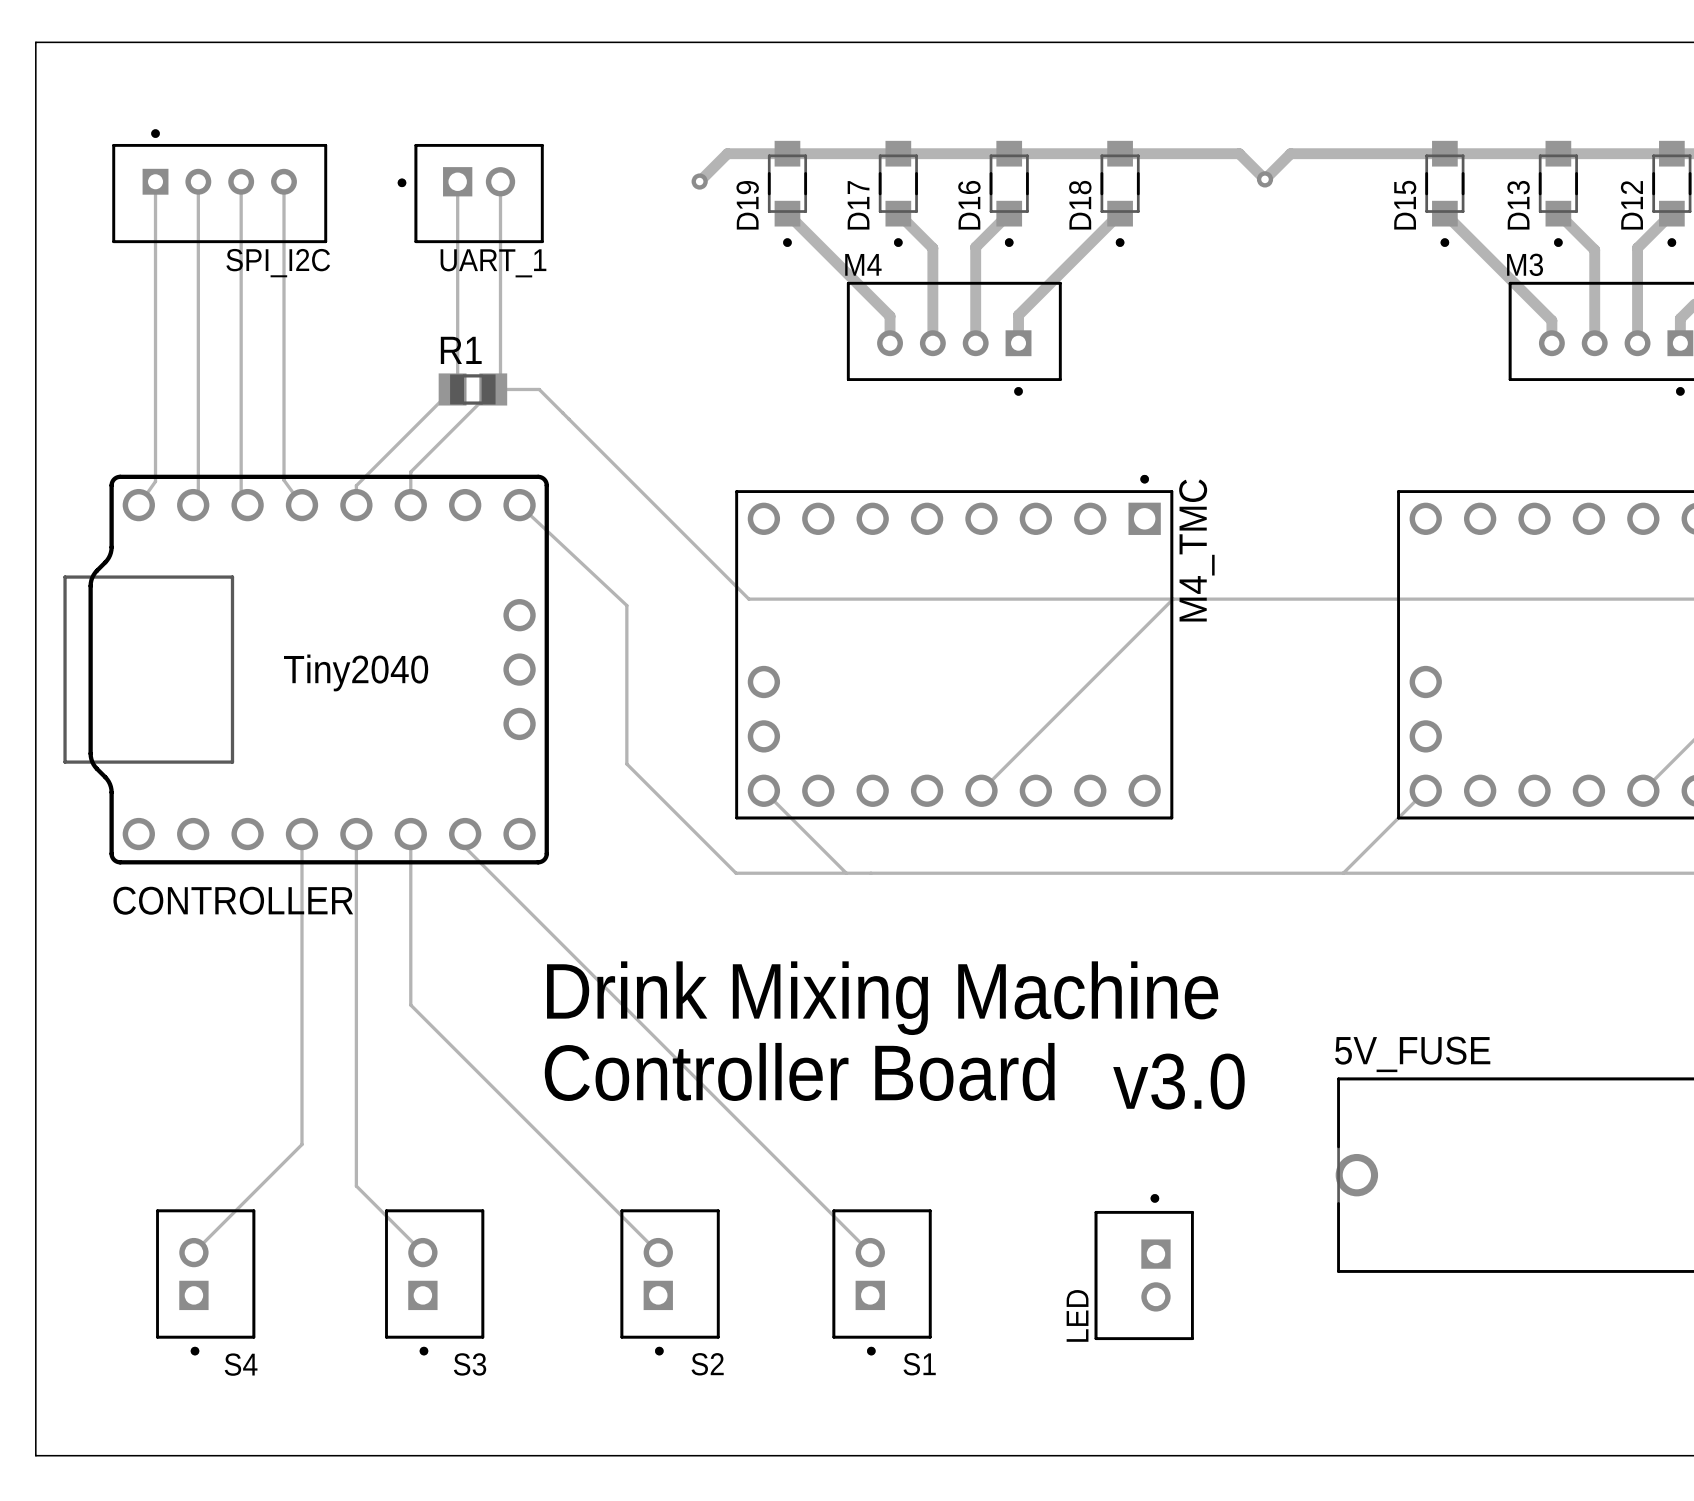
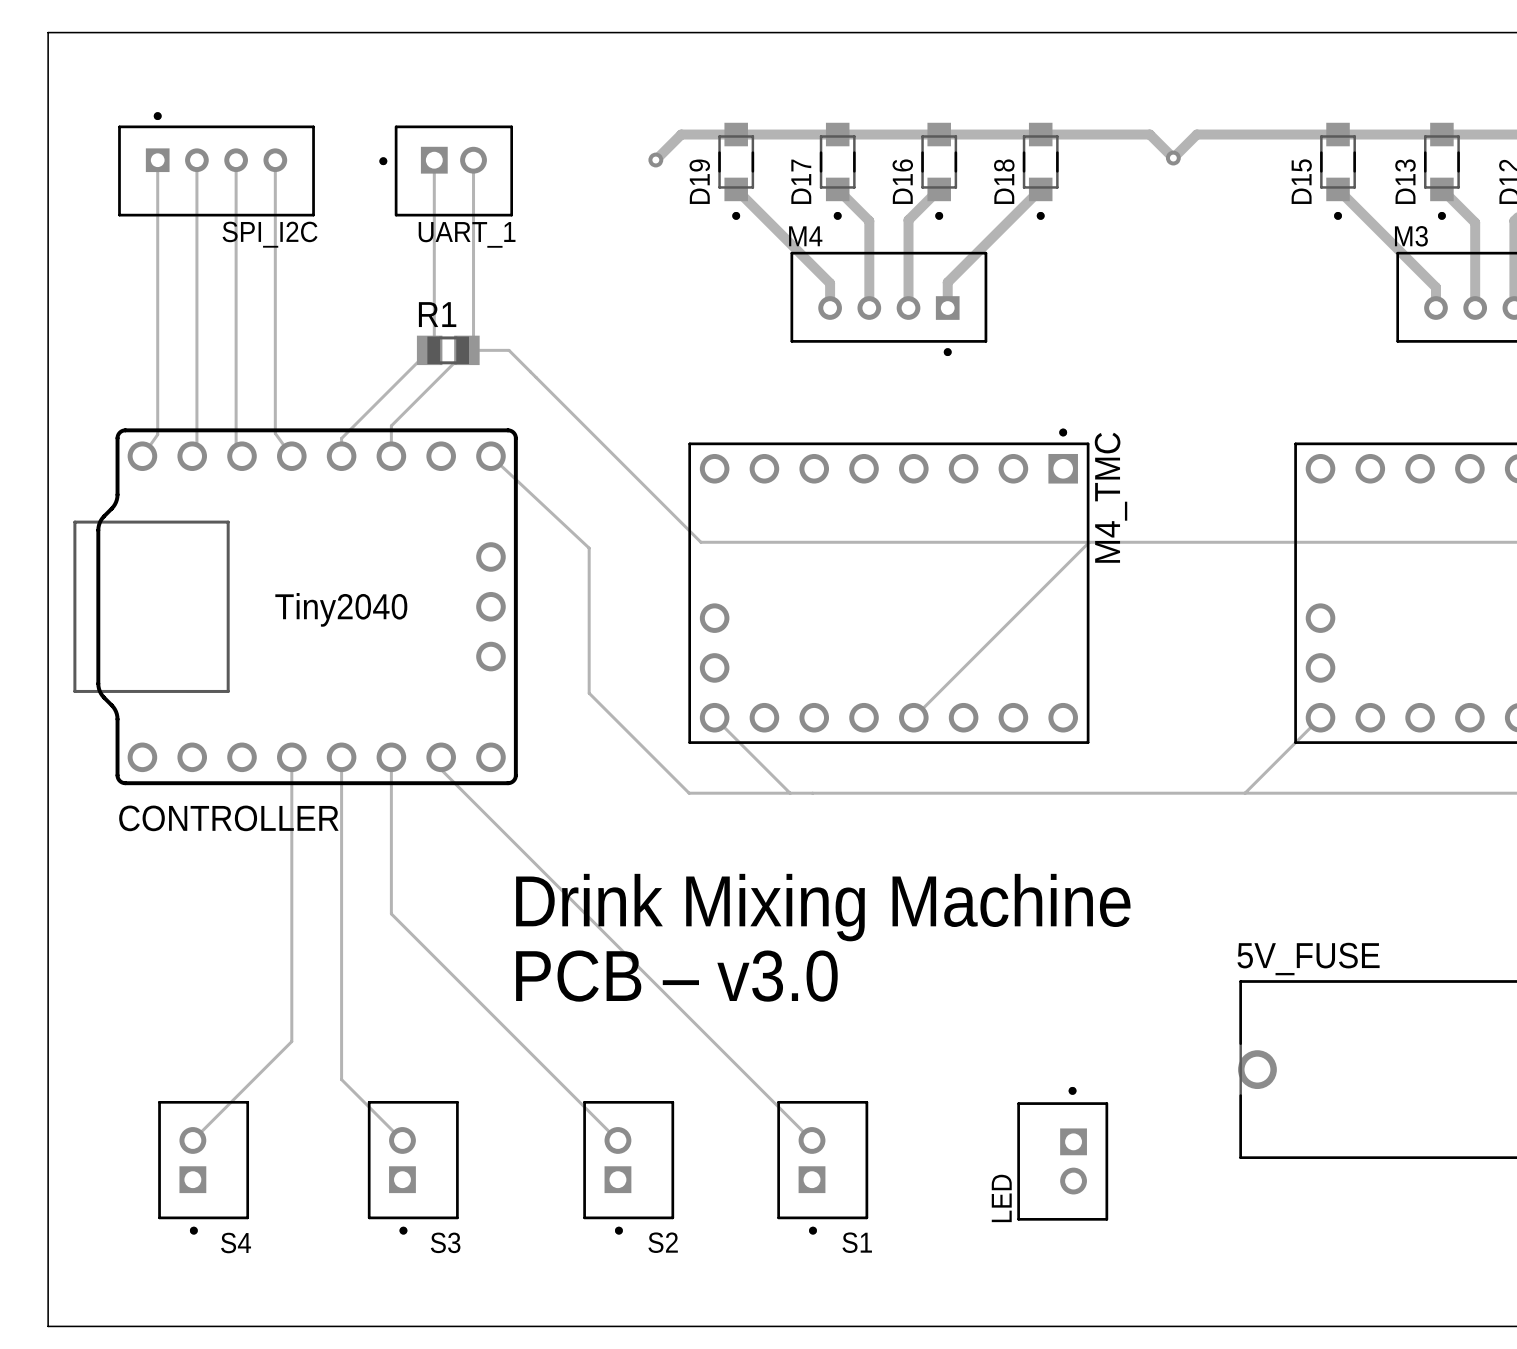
text: Controller Board (799, 1071) -> PCB – v3.0 (676, 976)
text: v3.0 (1178, 1081) -> none

